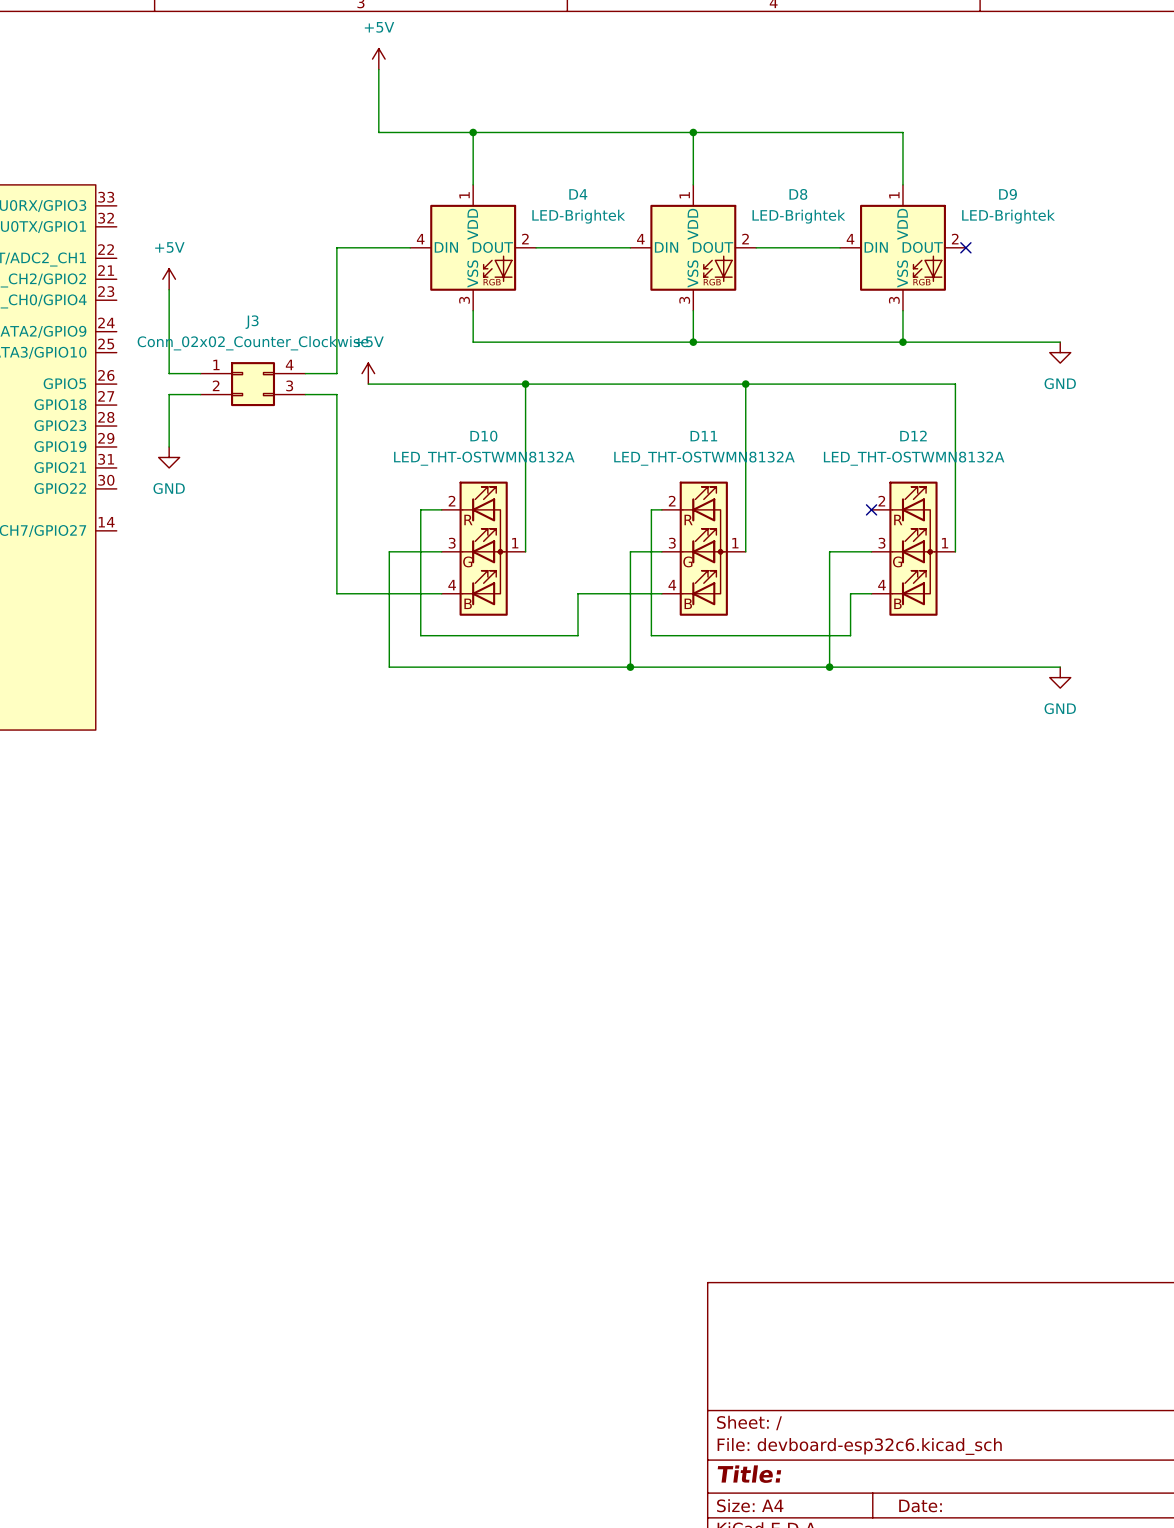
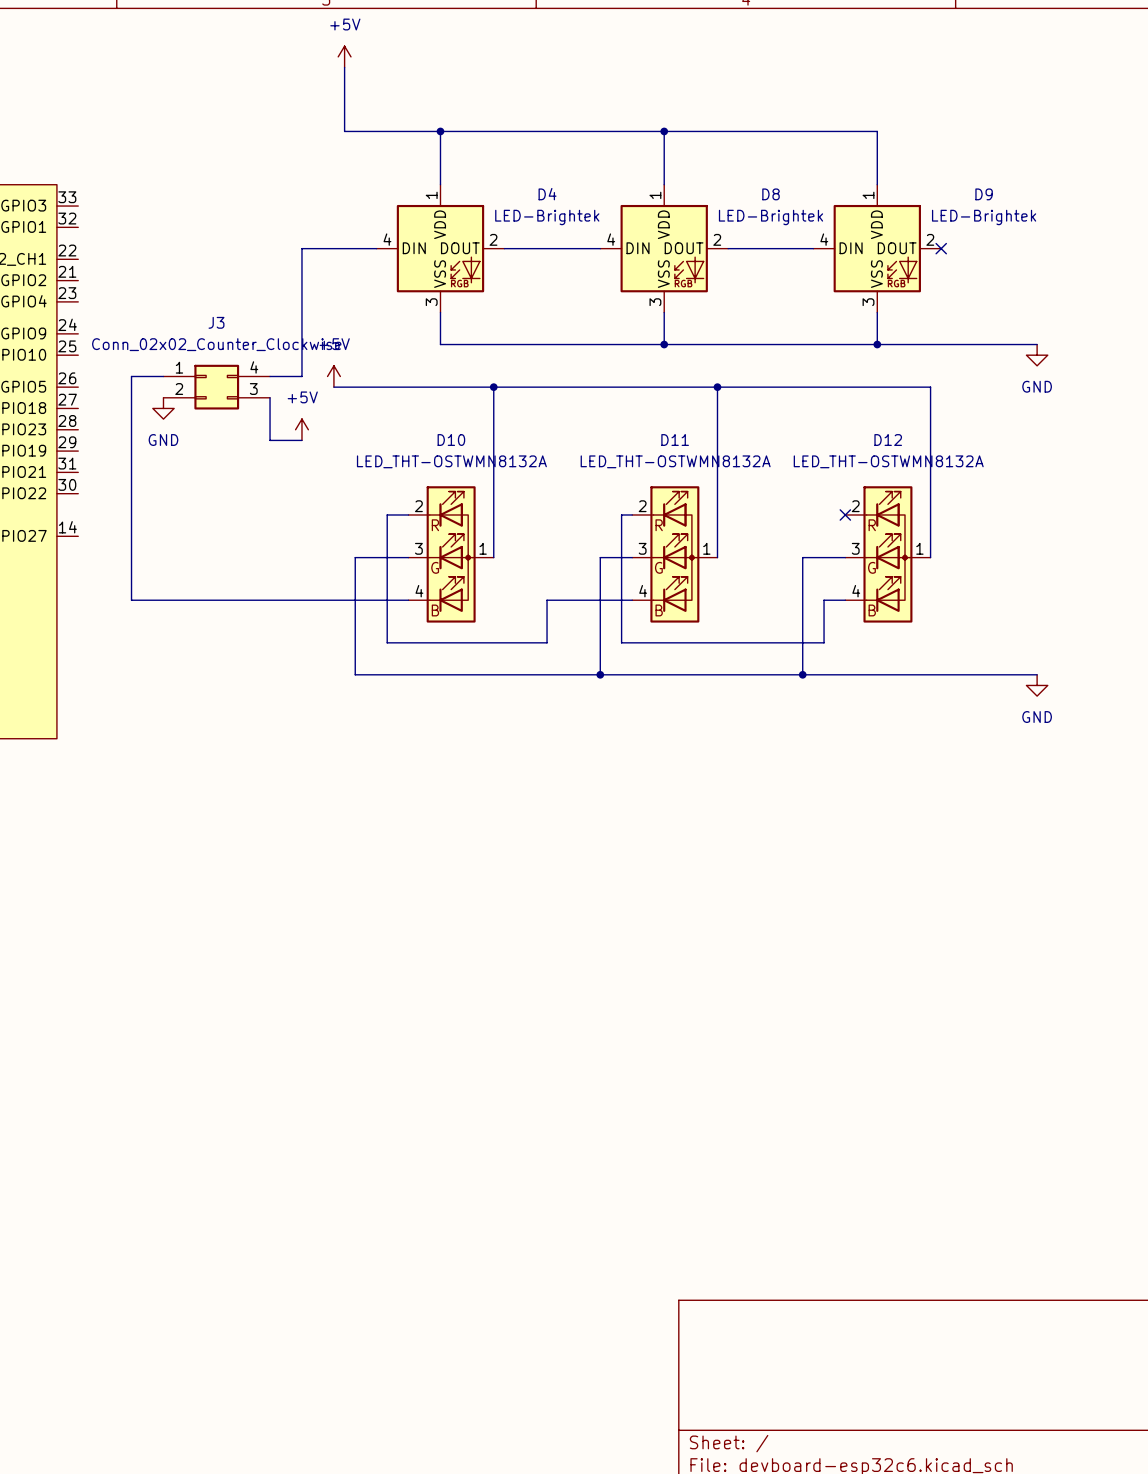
power symbol: +5V (169, 279) -> none
wire: (169, 289) (169, 373) -> none
wire: (169, 394) (200, 394) -> (131, 397) (131, 376)
wire: (305, 394) (336, 394) (336, 593) -> (131, 451) (131, 600) (301, 600)
wire: none -> (270, 397) (270, 440) (301, 440)
power symbol: none -> +5V (301, 429)
power symbol position: GND (169, 457) -> GND (163, 408)

